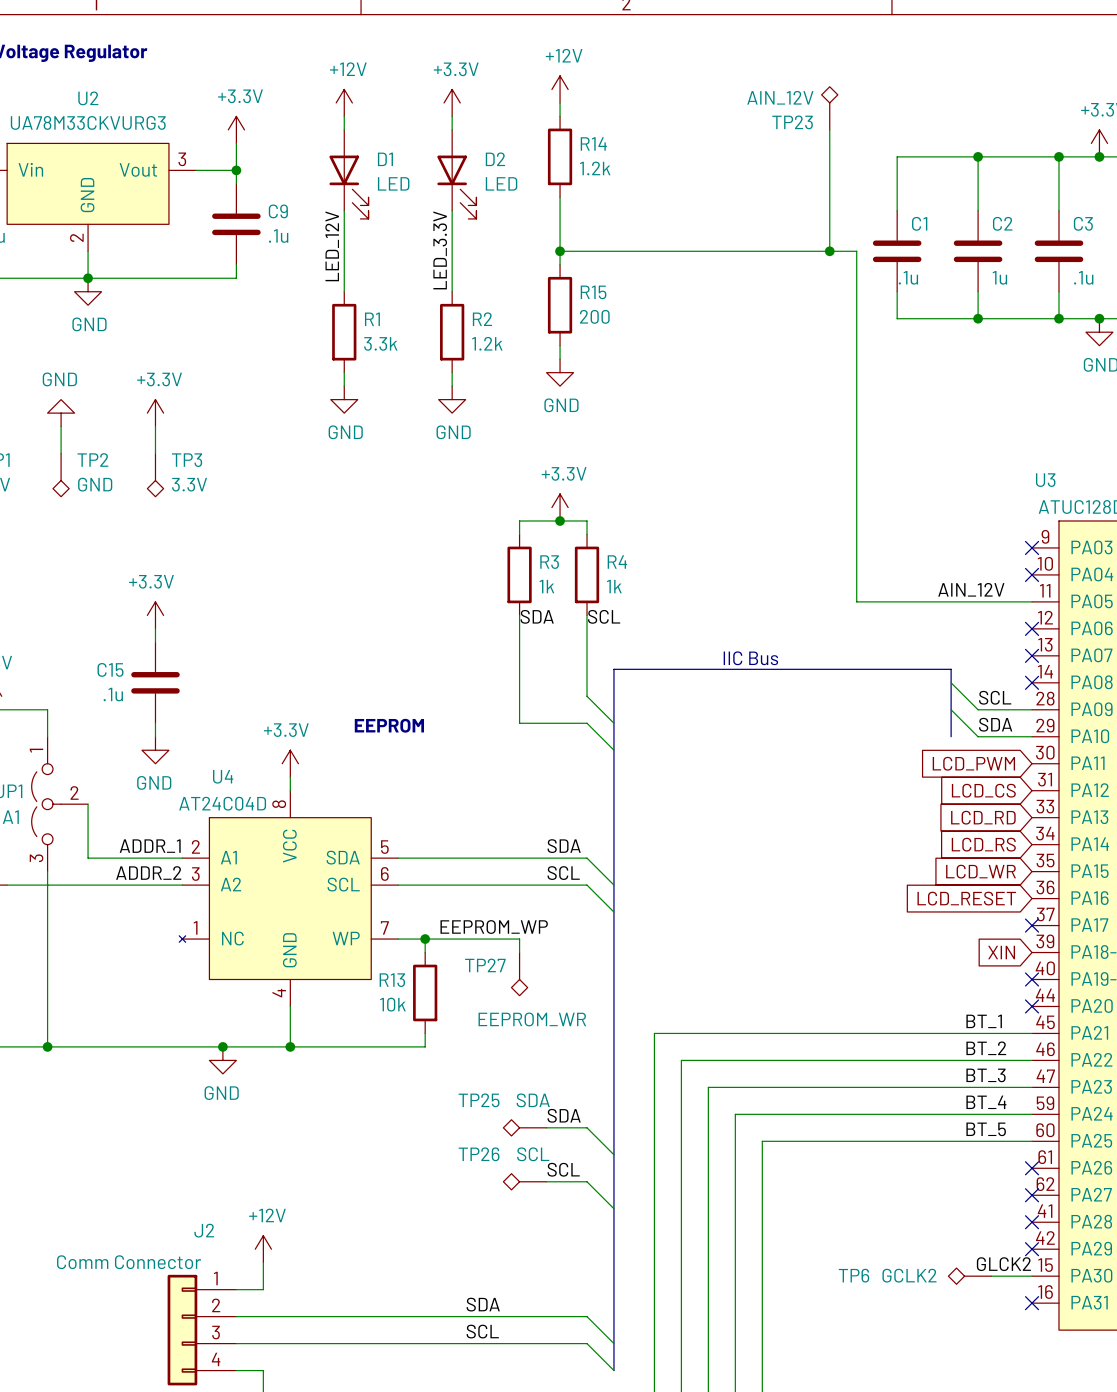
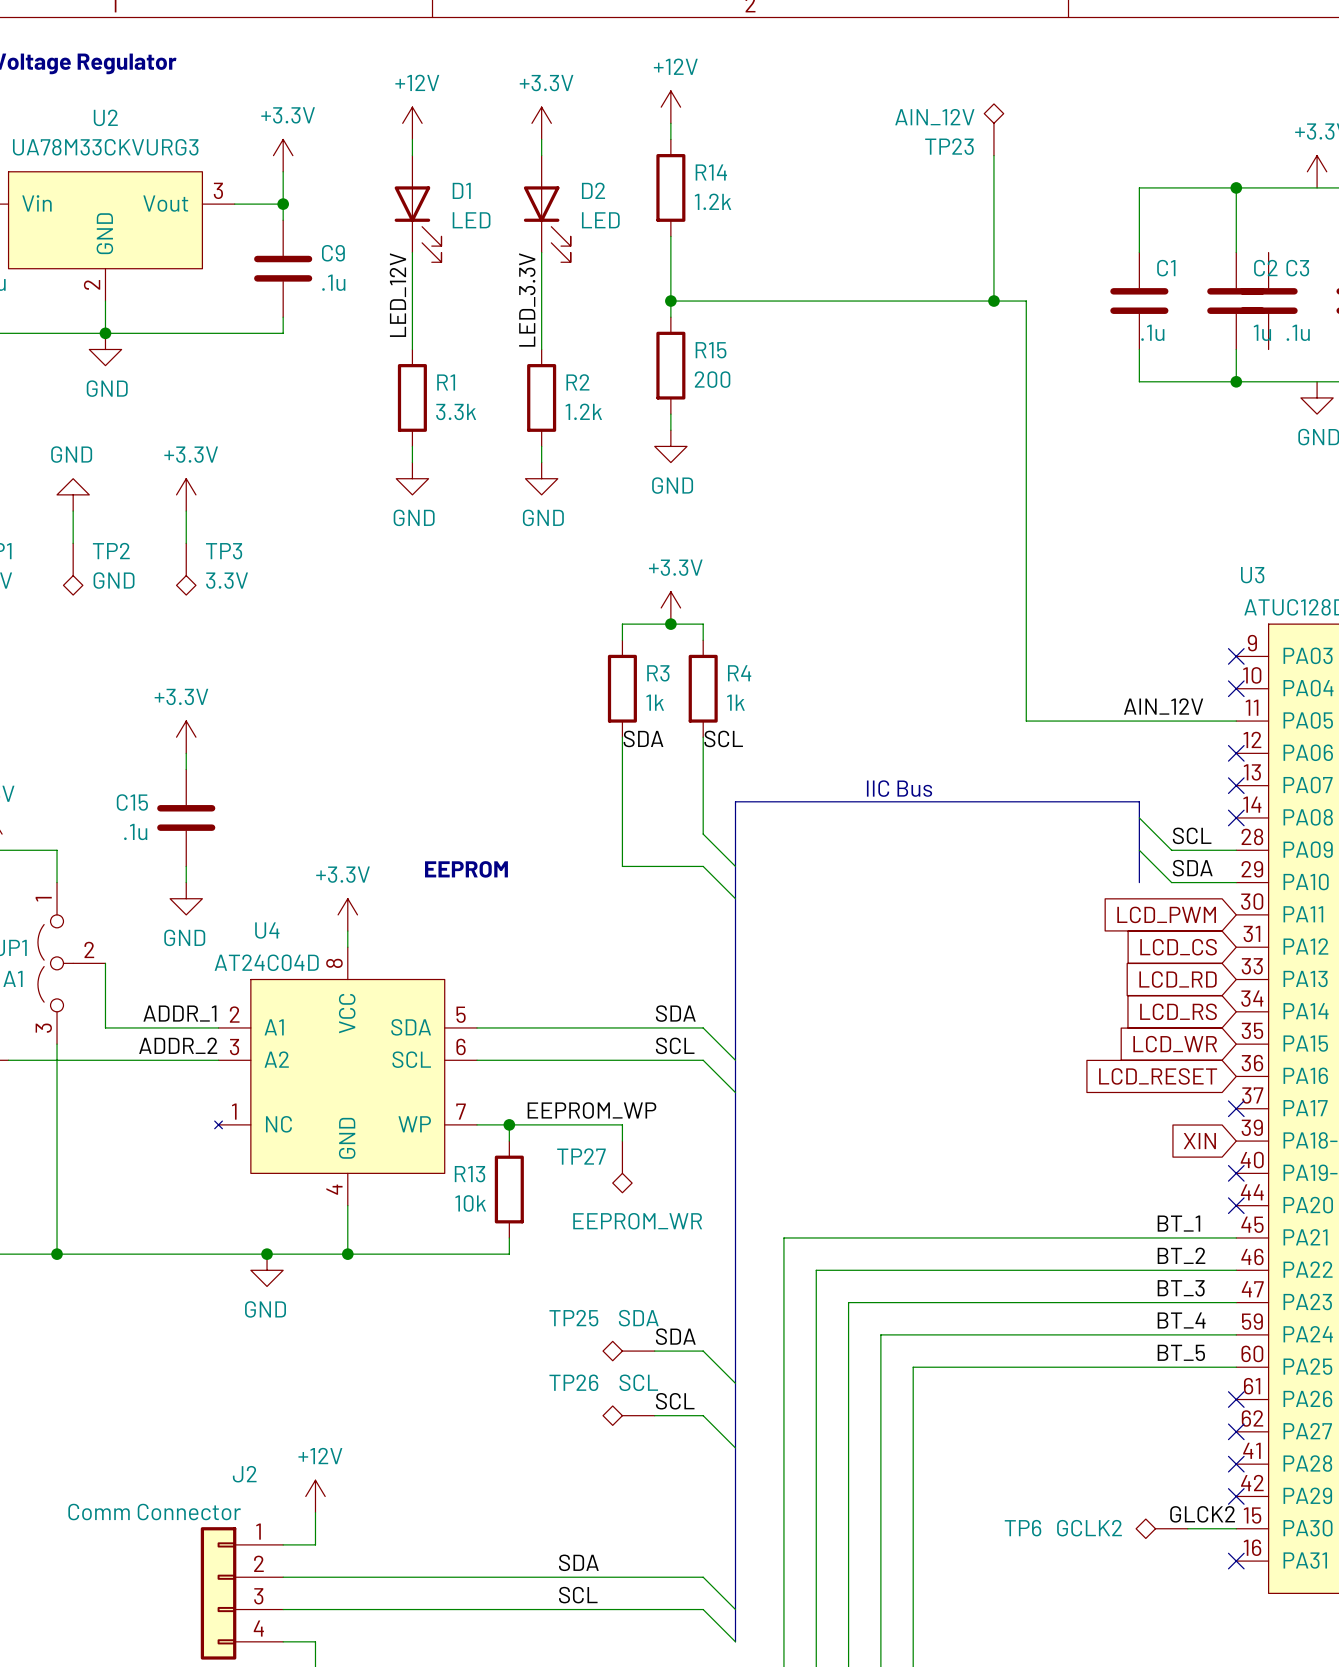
wire: (951, 156) (897, 156) (897, 210) -> (1139, 187) (1139, 252)
wire: (978, 156) (978, 210) -> none
junction: (978, 156) -> none
junction: none -> (1236, 187)
wire: (1058, 156) (1058, 210) -> (1236, 187) (1236, 252)
junction: (1058, 156) -> none
junction: (1099, 156) -> none
C1 position: (897, 251) -> (1139, 301)
C2 position: (978, 251) -> (1236, 301)
wire: (897, 291) (897, 318) (951, 318) -> (1139, 349) (1139, 381)
wire: (978, 291) (978, 318) -> none
wire: (1058, 291) (1058, 318) -> (1236, 349) (1236, 381)
junction: (978, 318) -> none
junction: none -> (1236, 381)
junction: (1058, 318) -> none
junction: (1099, 318) -> none

